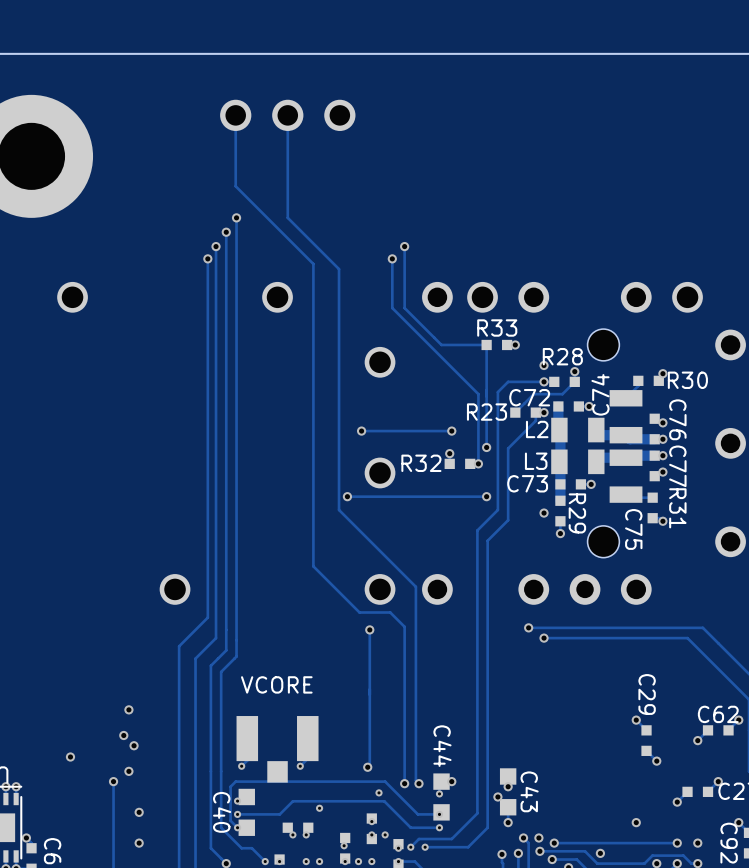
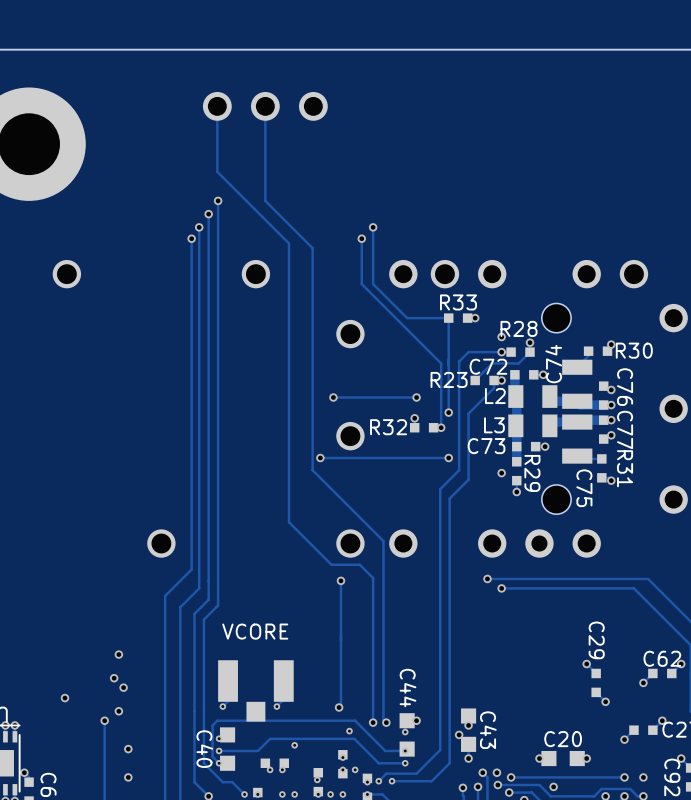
via: none -> (539, 758)
C20: none -> (563, 758)

